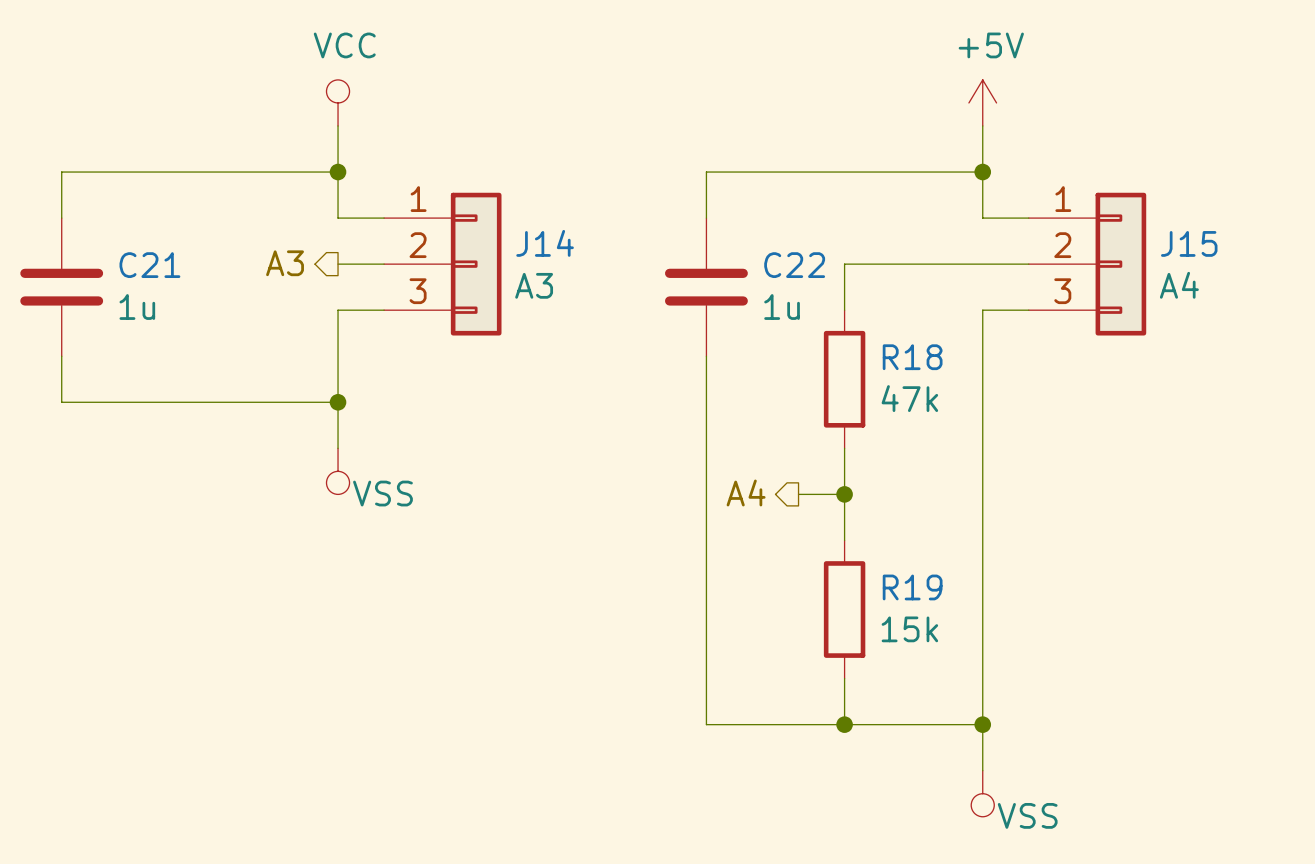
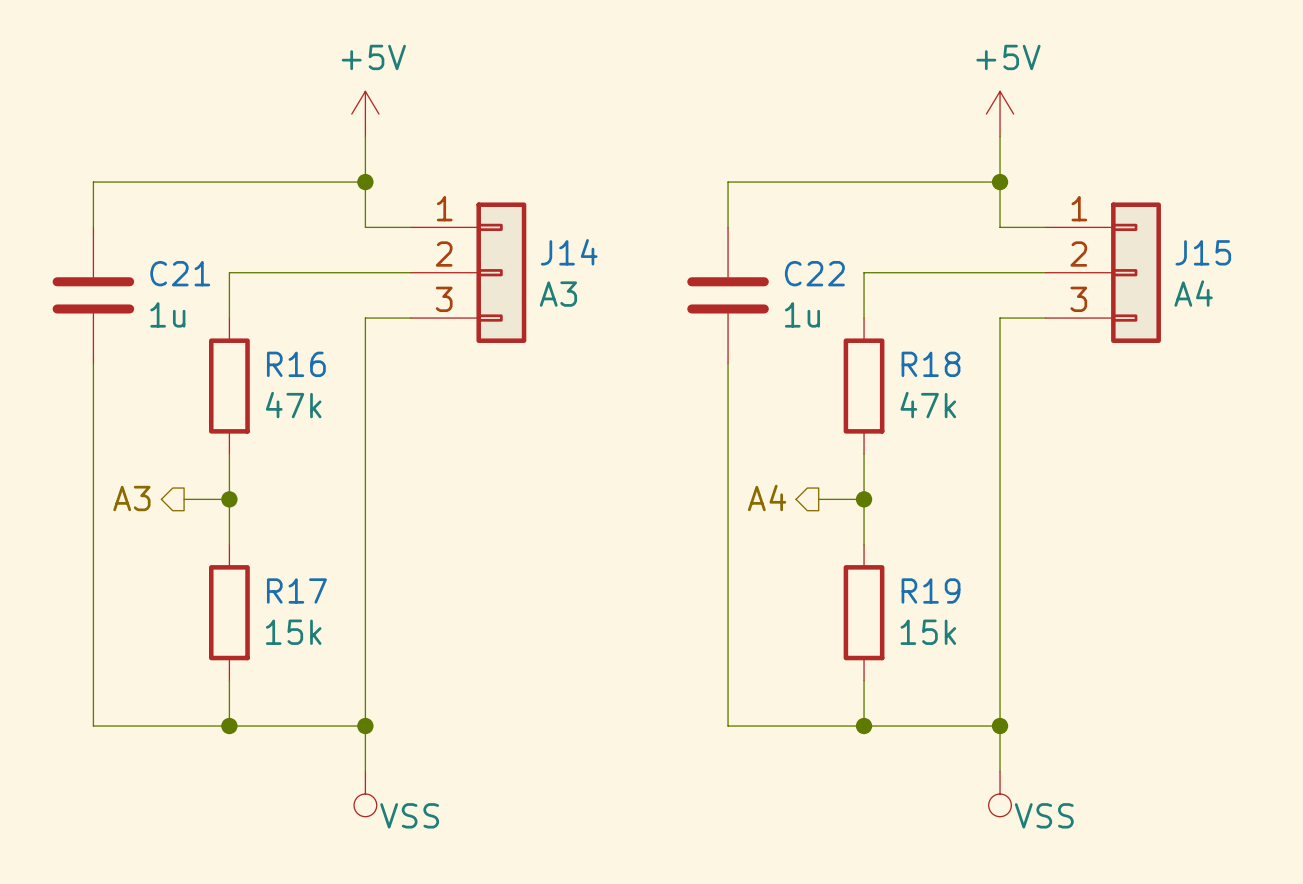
power symbol: VCC (338, 102) -> +5V (365, 114)
hierarchical label position: A3 (285, 263) -> A3 (131, 498)
wire: none -> (365, 272) (229, 272) (229, 318)
R16: none -> 47k (229, 386)
wire: (61, 402) (338, 402) -> (93, 408) (93, 726) (365, 726)
junction: (338, 402) -> none
wire: none -> (229, 454) (229, 544)
wire: none -> (365, 454) (365, 771)
power symbol position: VSS (338, 471) -> VSS (365, 794)
wire: none -> (184, 499) (229, 499)
junction: none -> (229, 499)
R17: none -> 15k (229, 612)
wire: none -> (229, 680) (229, 726)
junction: none -> (229, 726)
junction: none -> (365, 726)

